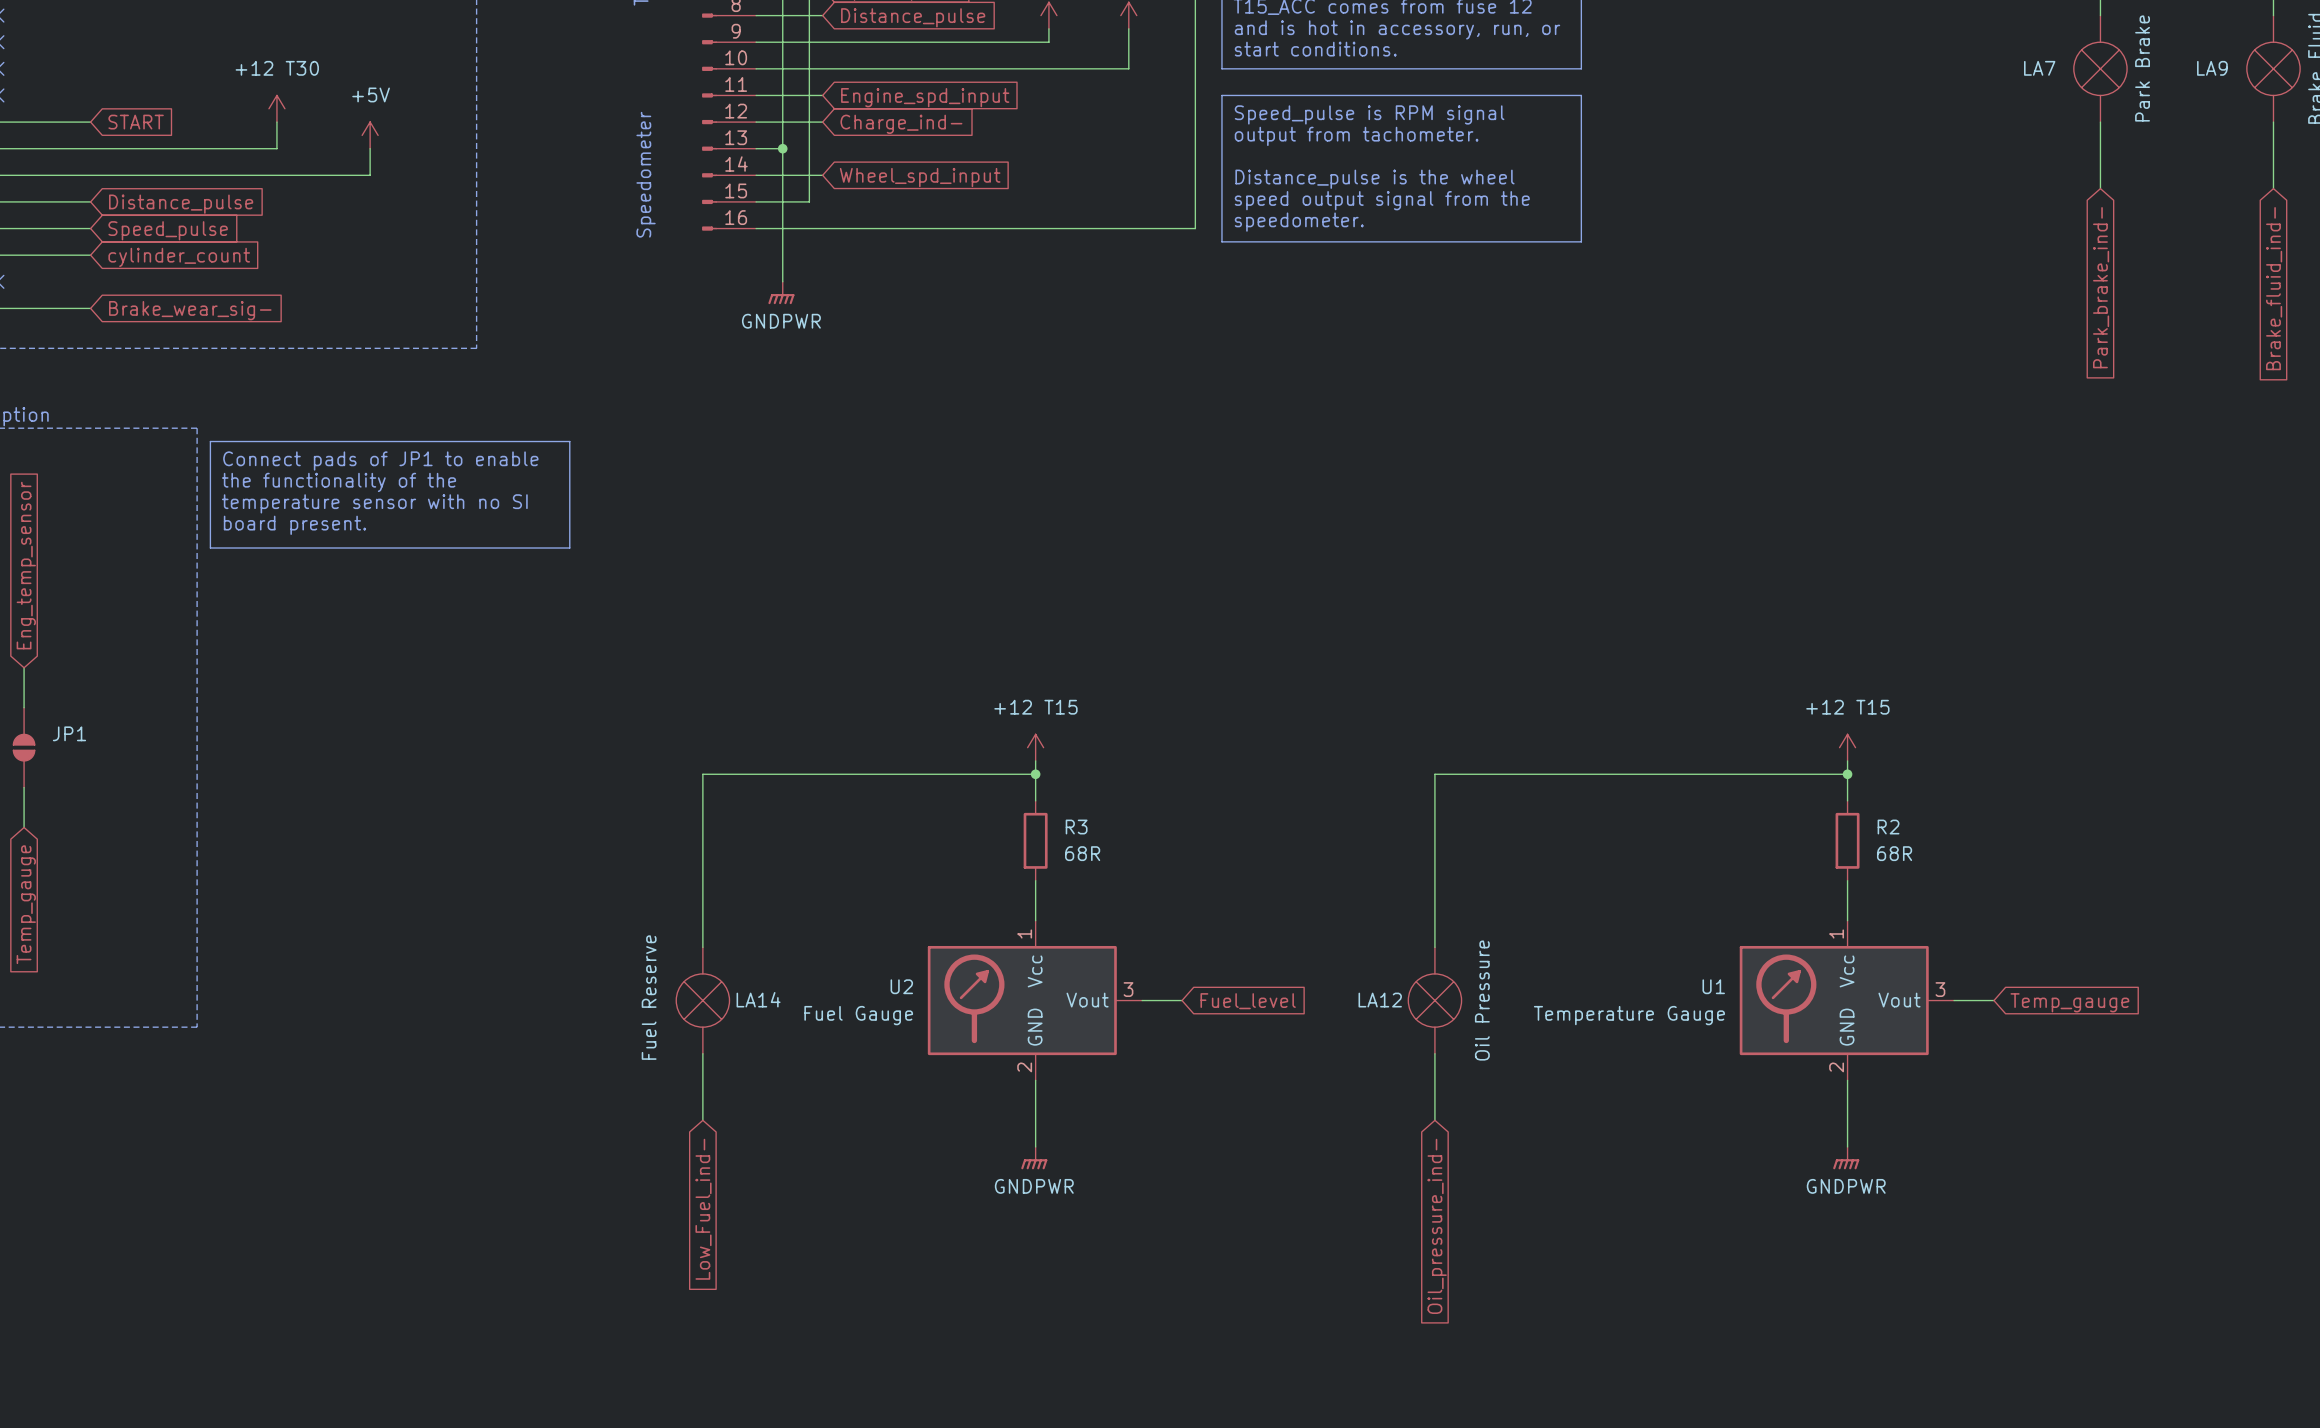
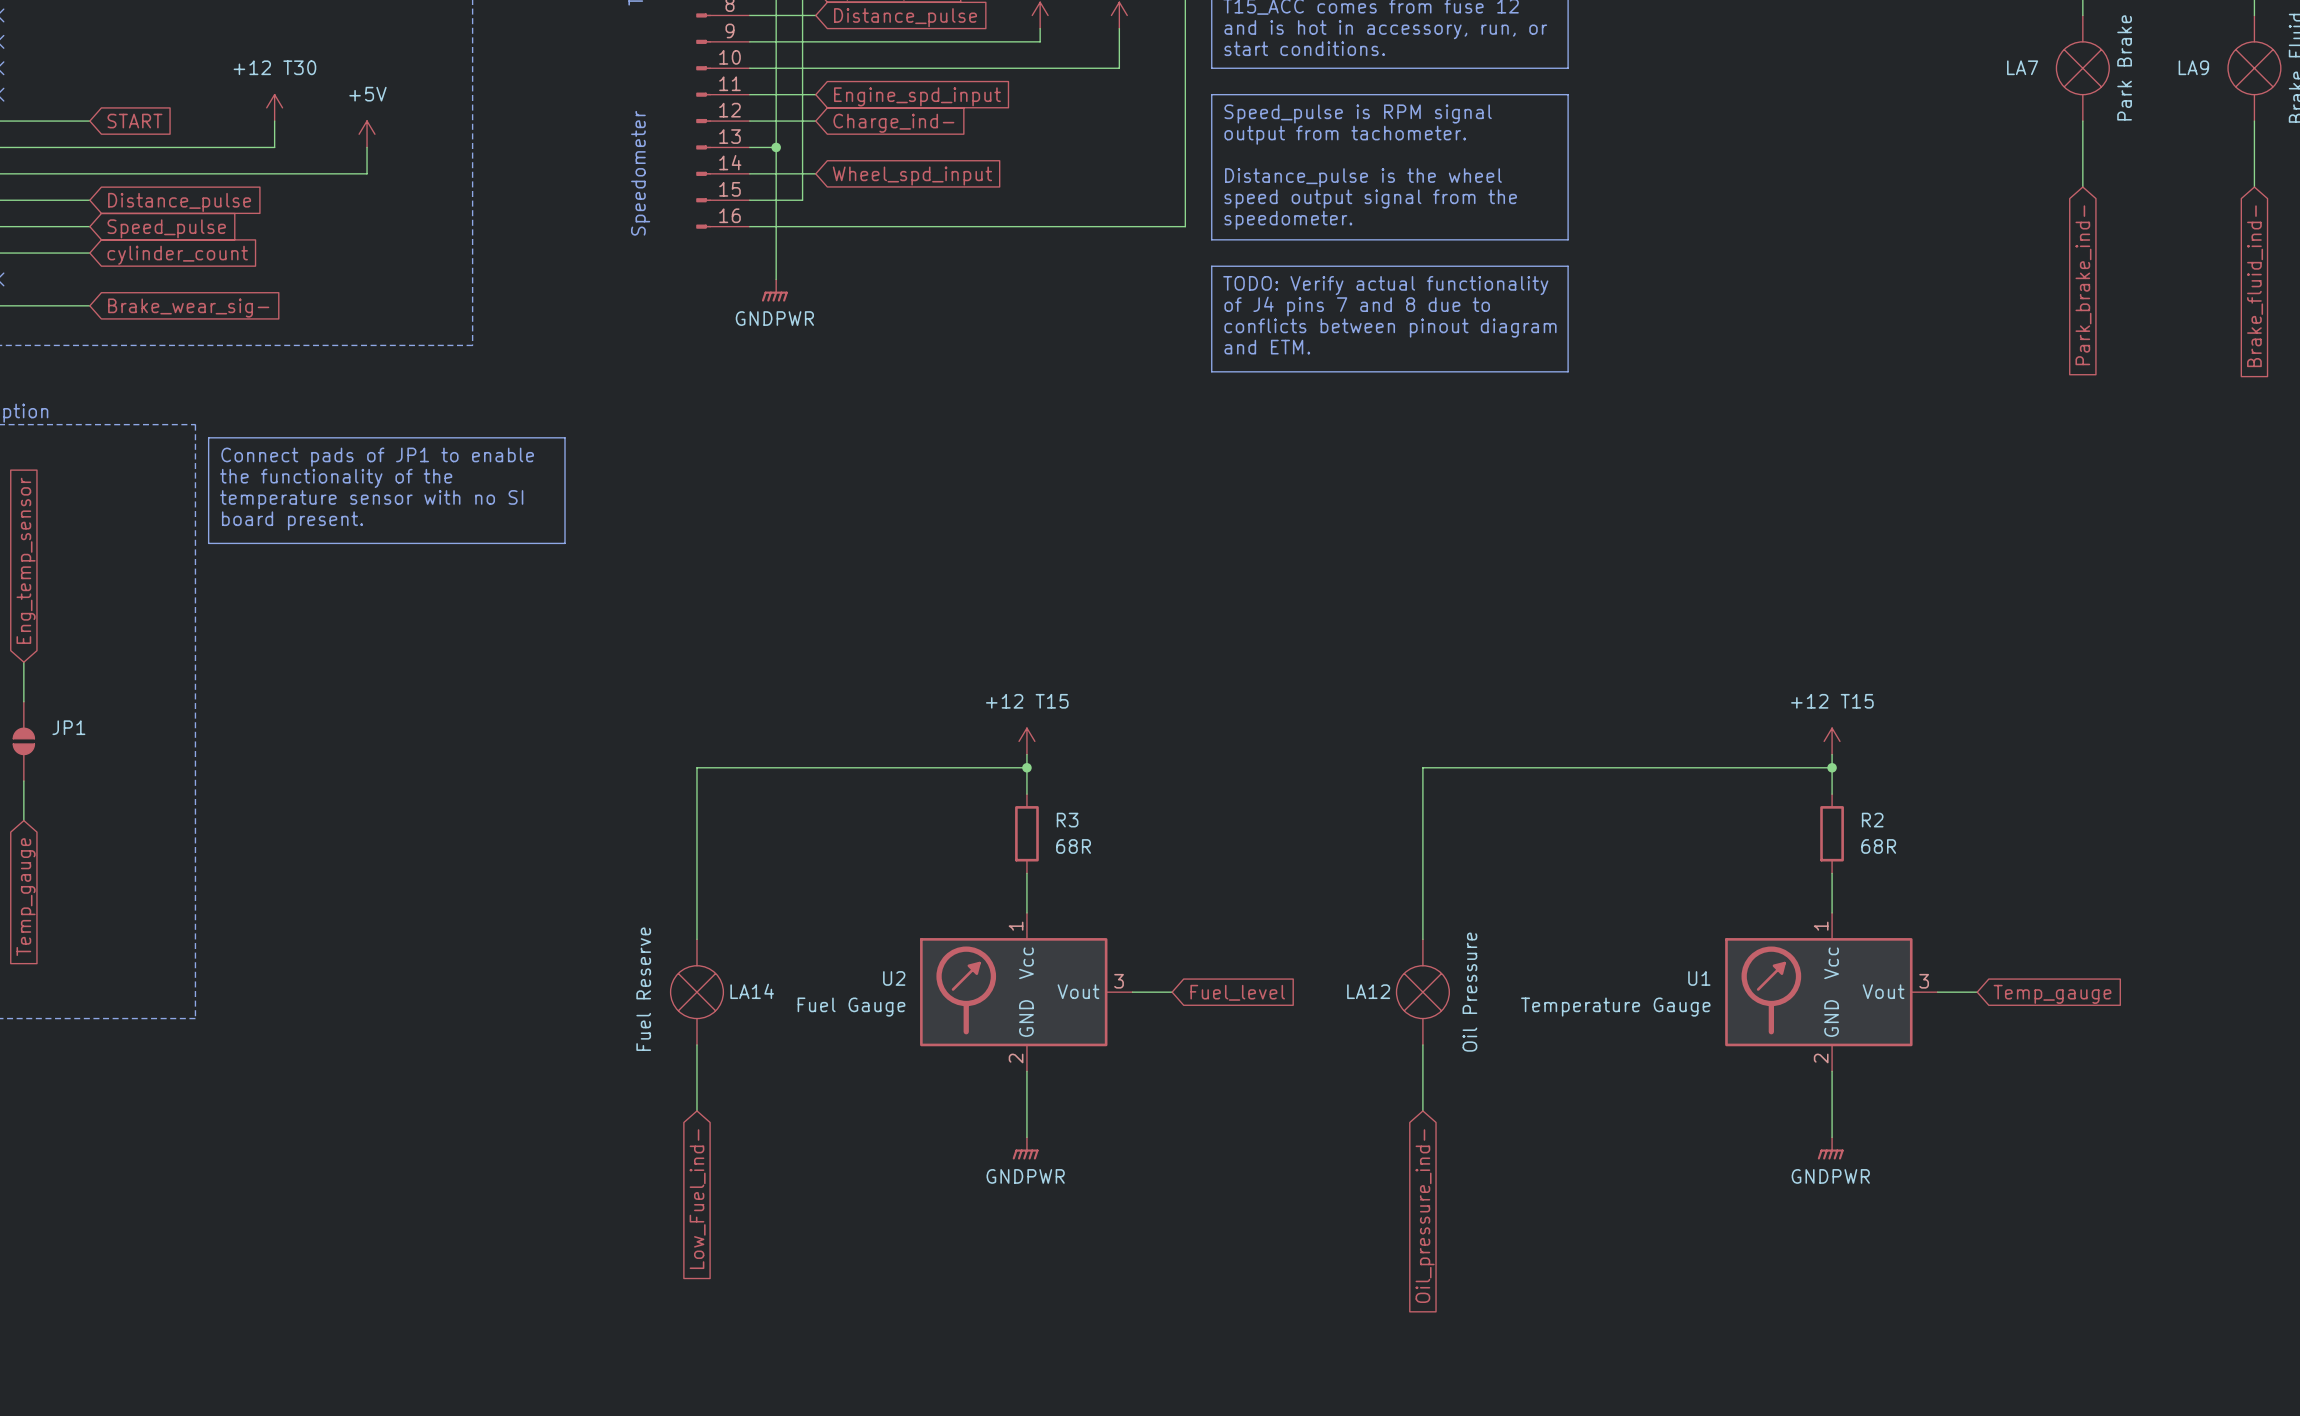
line: none -> (1211, 266) (1568, 266) (1568, 371) (1211, 371) (1211, 266)
text: none -> TODO: Verify actual functionality (1385, 285)
text: none -> of J4 pins 7 and 8 due to (1357, 306)
text: none -> conflicts between pinout diagram (1390, 328)
text: none -> and ETM. (1267, 347)

